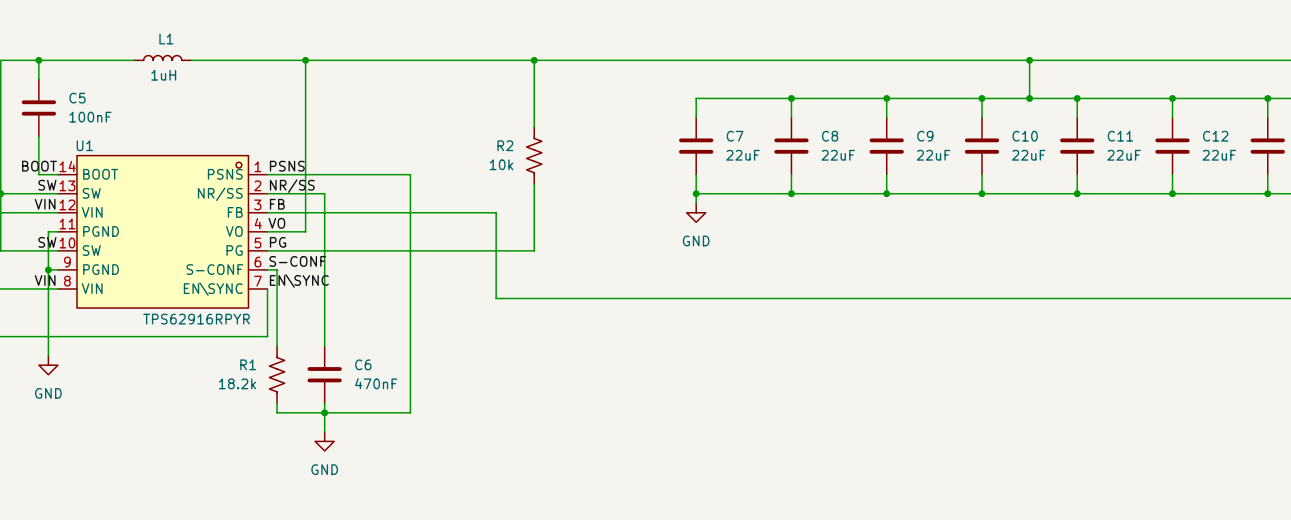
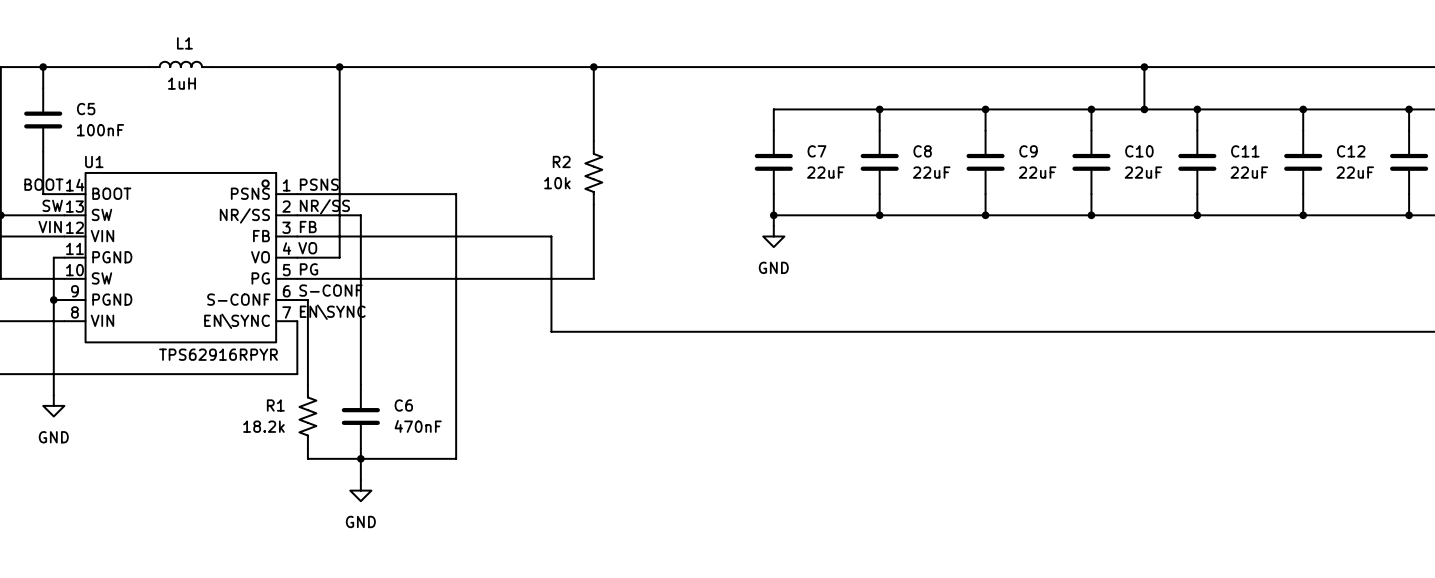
label: SW (47, 242) -> none
label: VIN (45, 280) -> none

